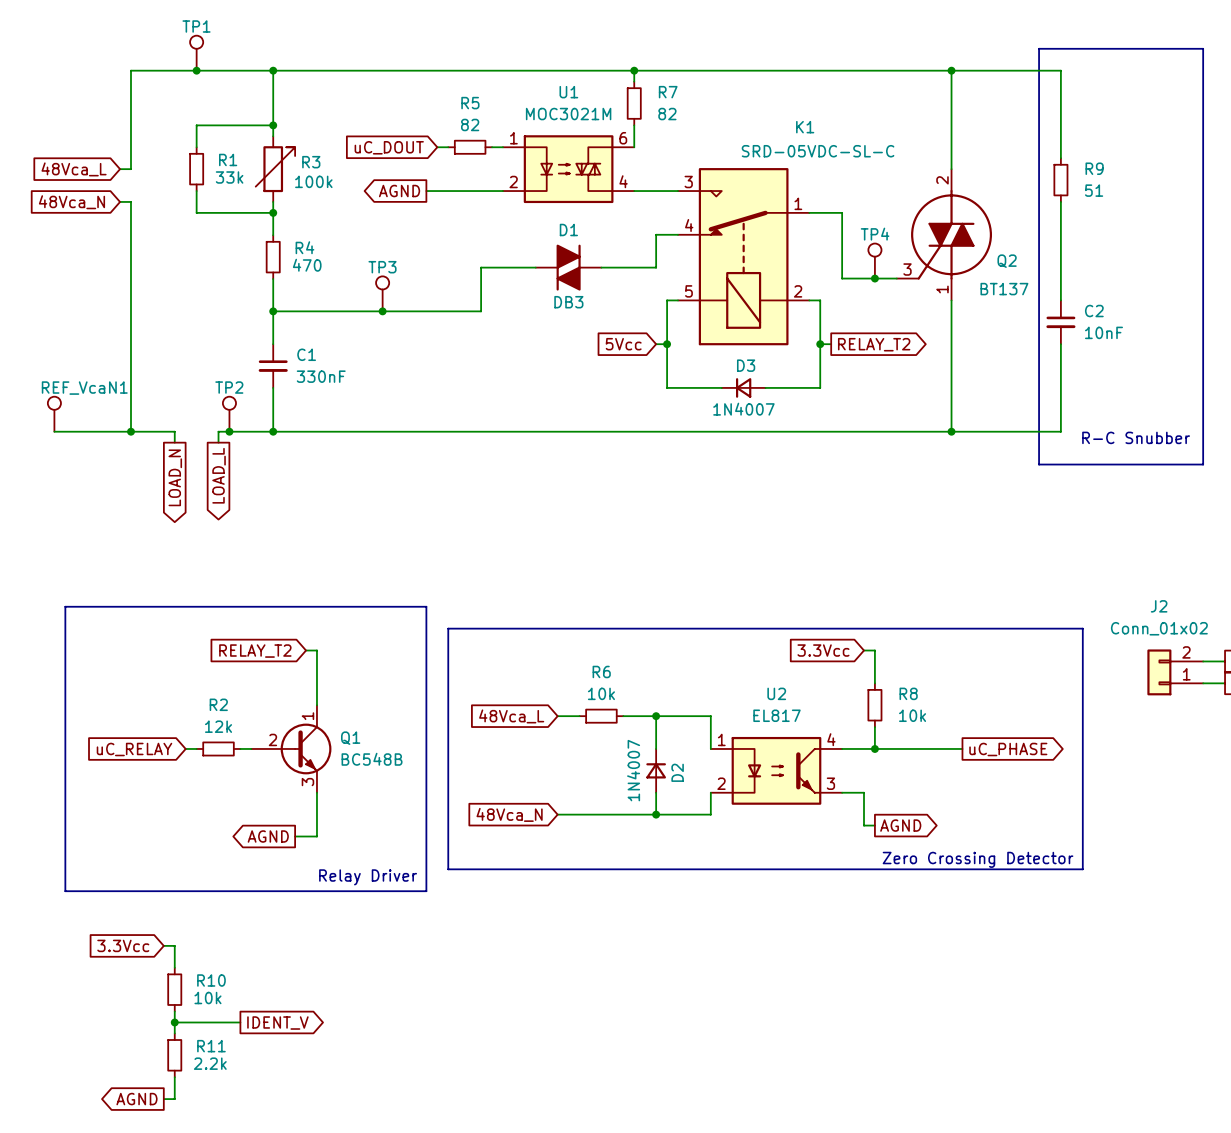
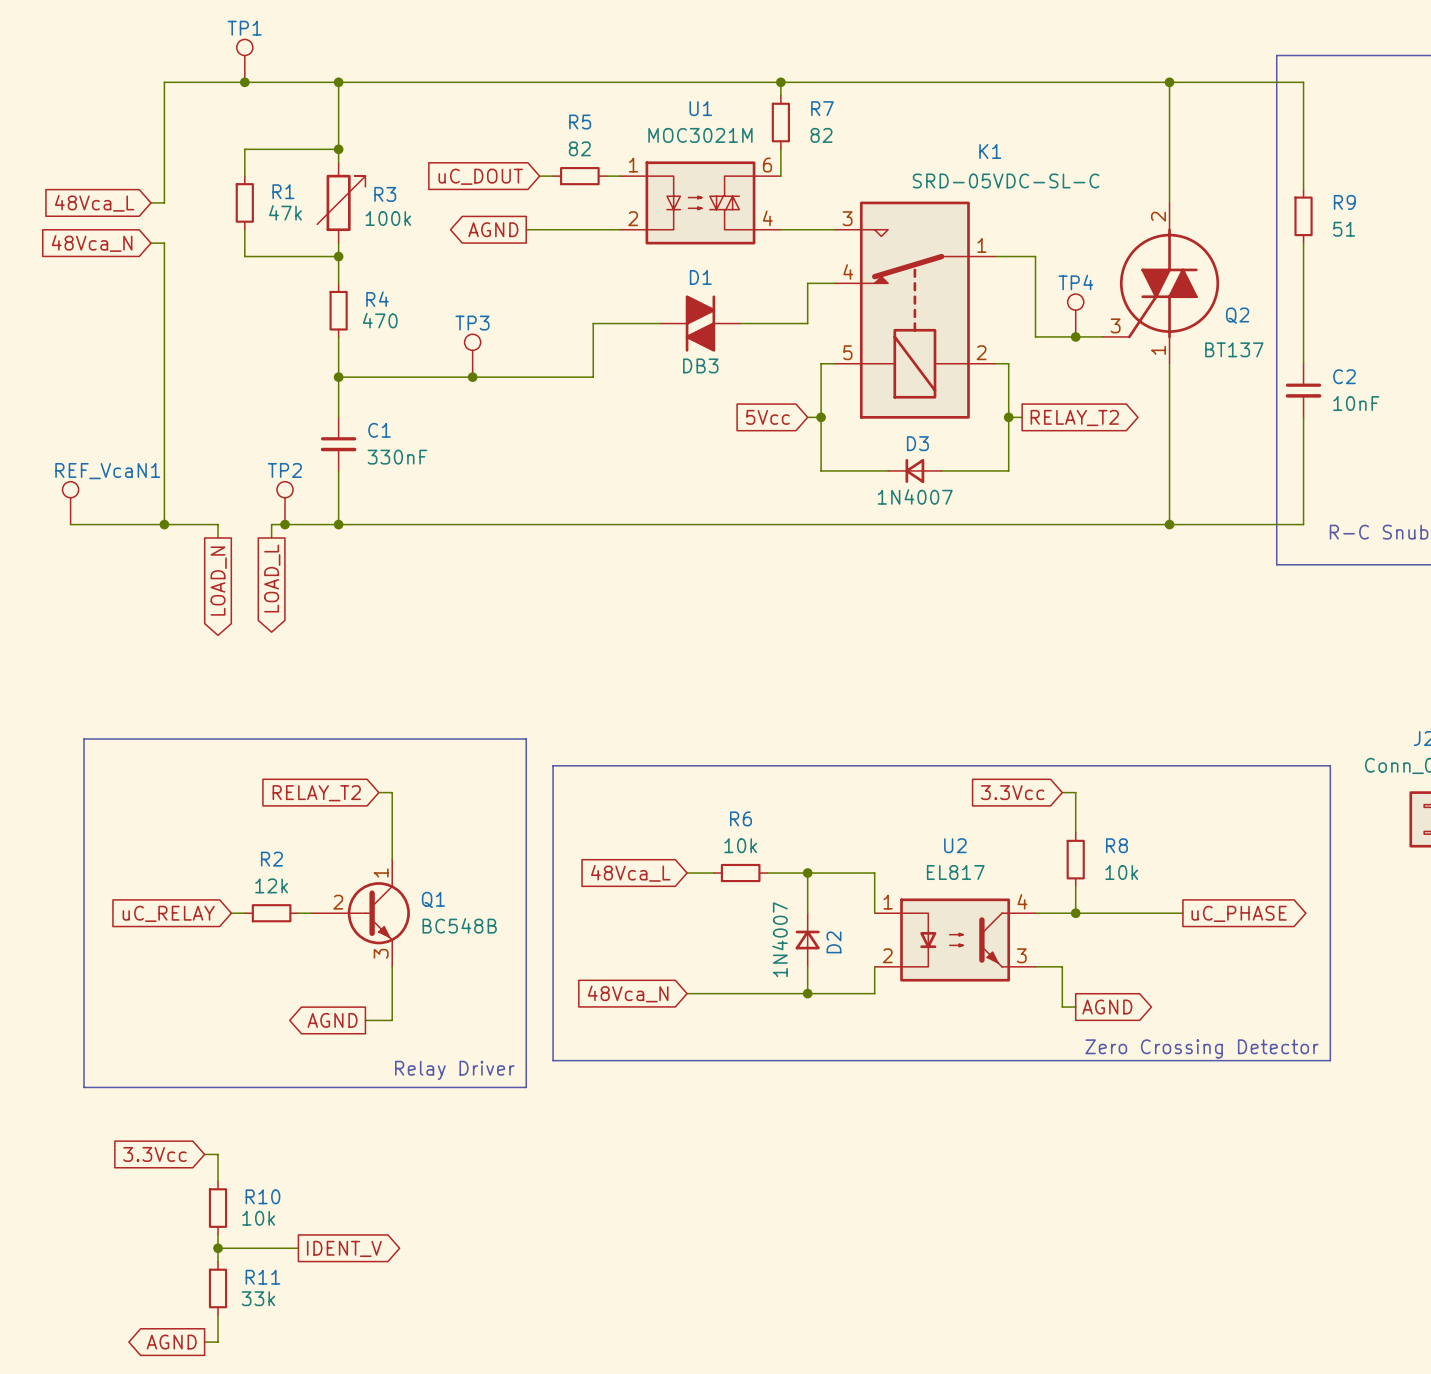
R1 value: 33k (229, 177) -> 47k (285, 212)
R11 value: 2.2k (210, 1063) -> 33k (258, 1298)

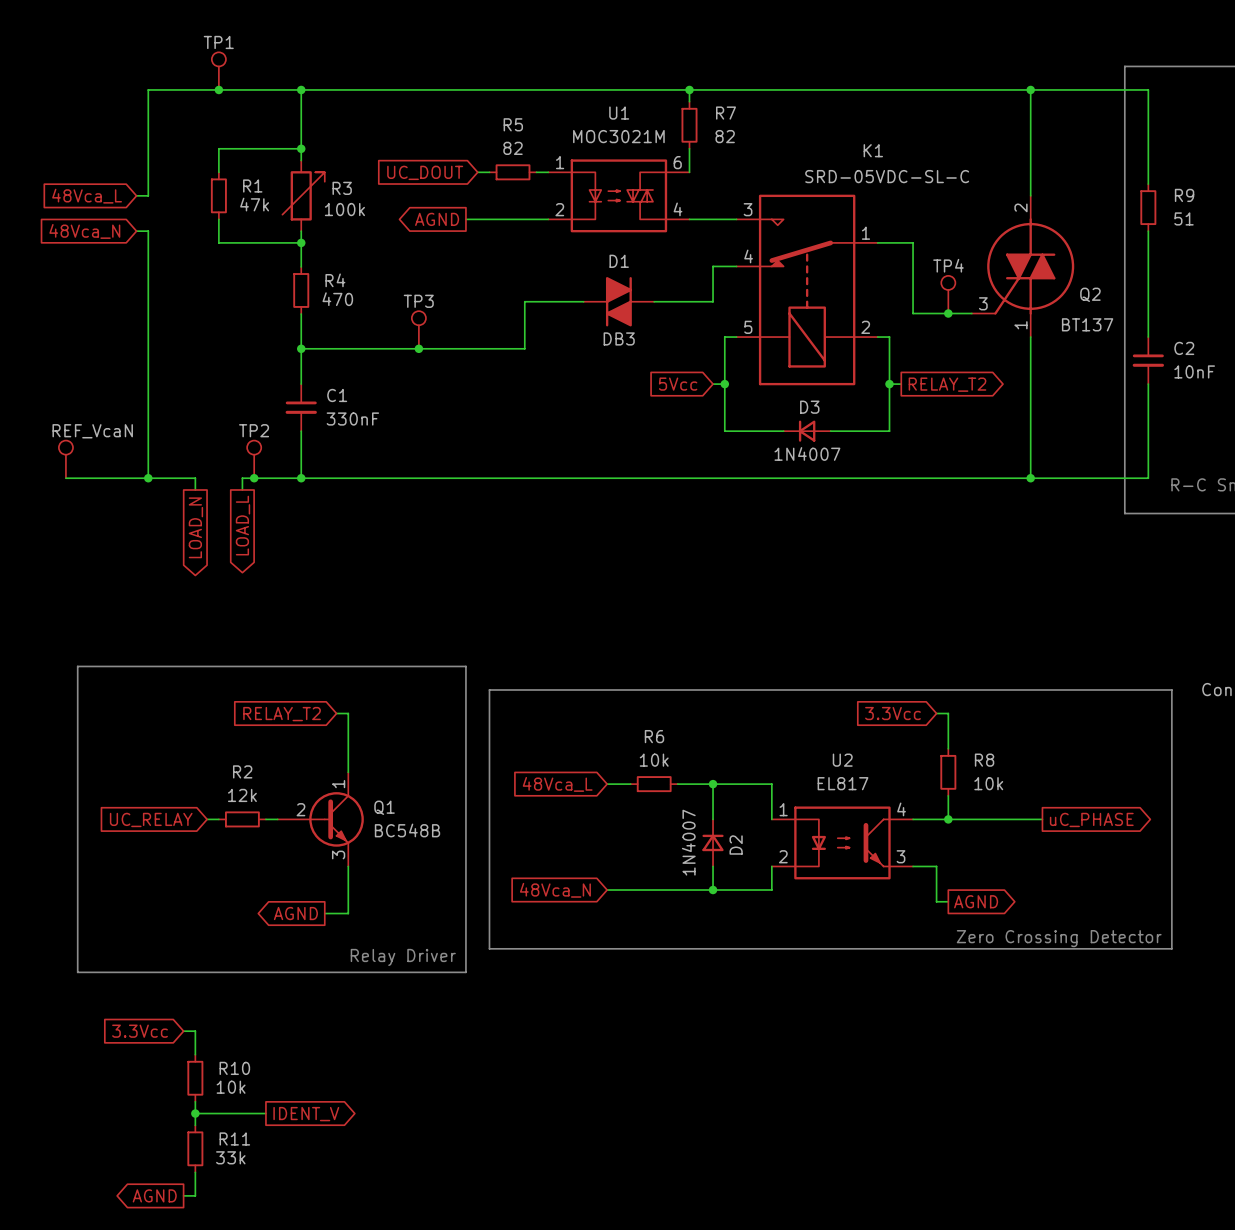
global label: uC_DOUT (480, 176) -> UC_DOUT (425, 172)
REF_VcaN1 name: REF_VcaN1 (107, 471) -> REF_VcaN (92, 431)
global label: uC_RELAY (168, 913) -> UC_RELAY (151, 819)

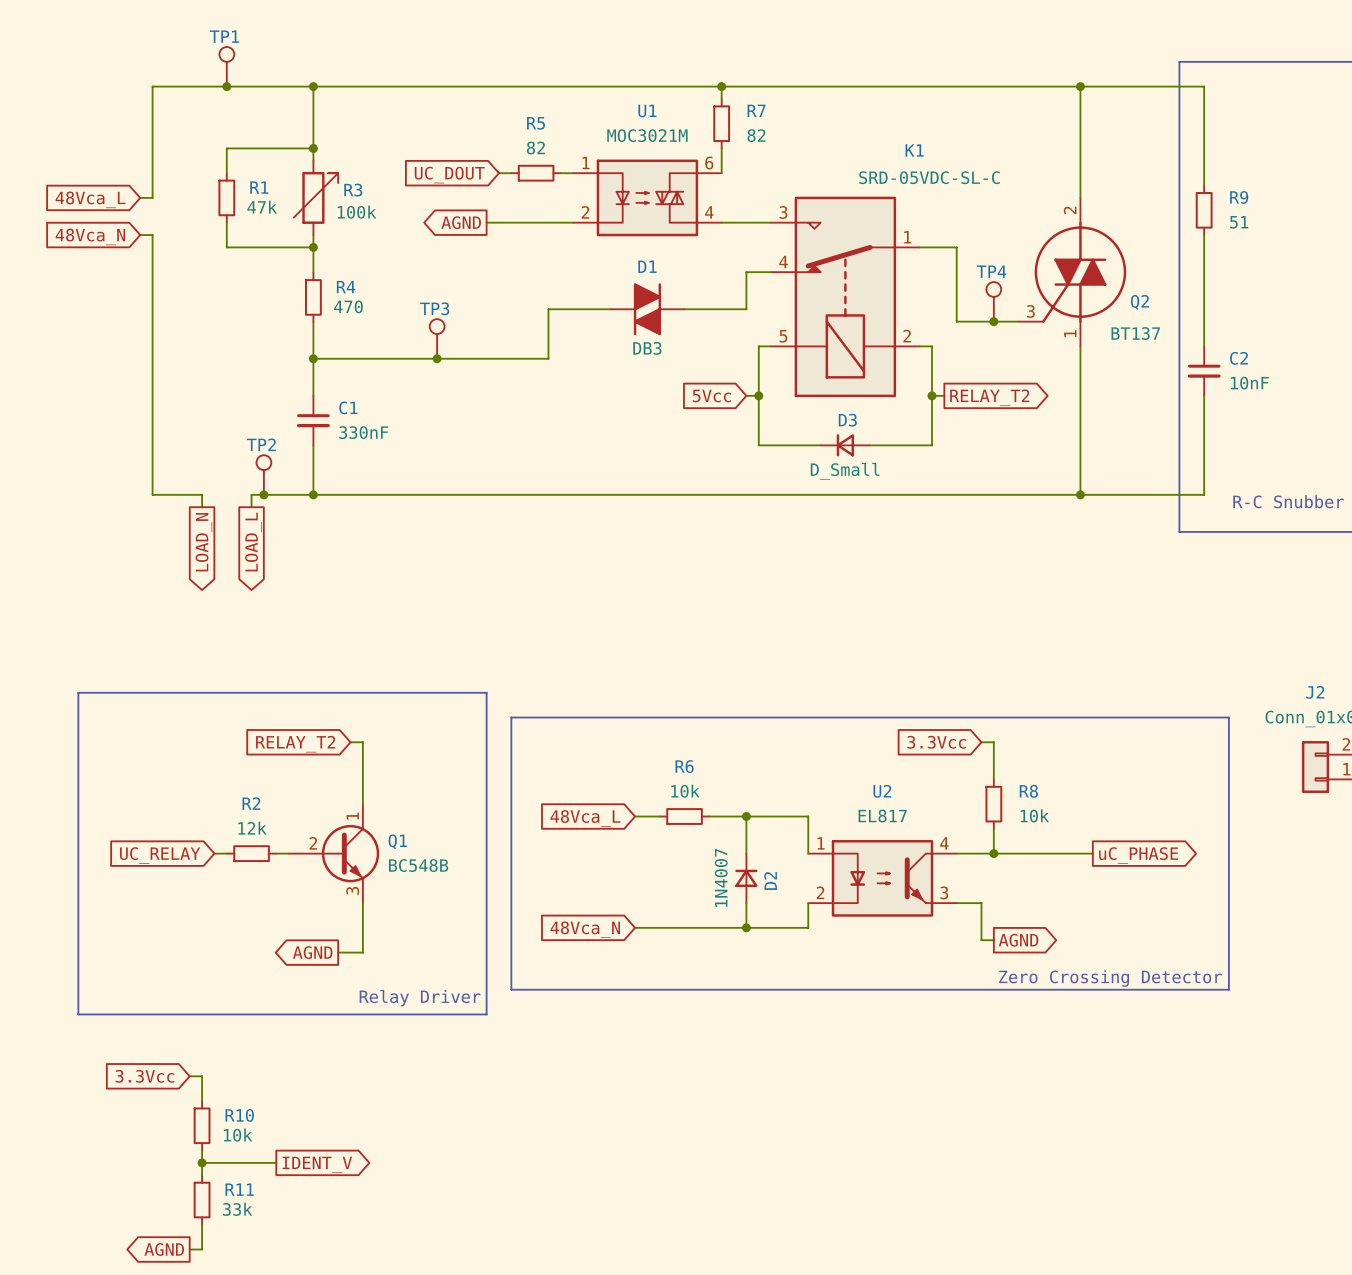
D3 value: 1N4007 (807, 453) -> D_Small (845, 471)
REF_VcaN: (65, 459) -> none
wire: (65, 478) (148, 478) -> none
junction: (148, 478) -> none

